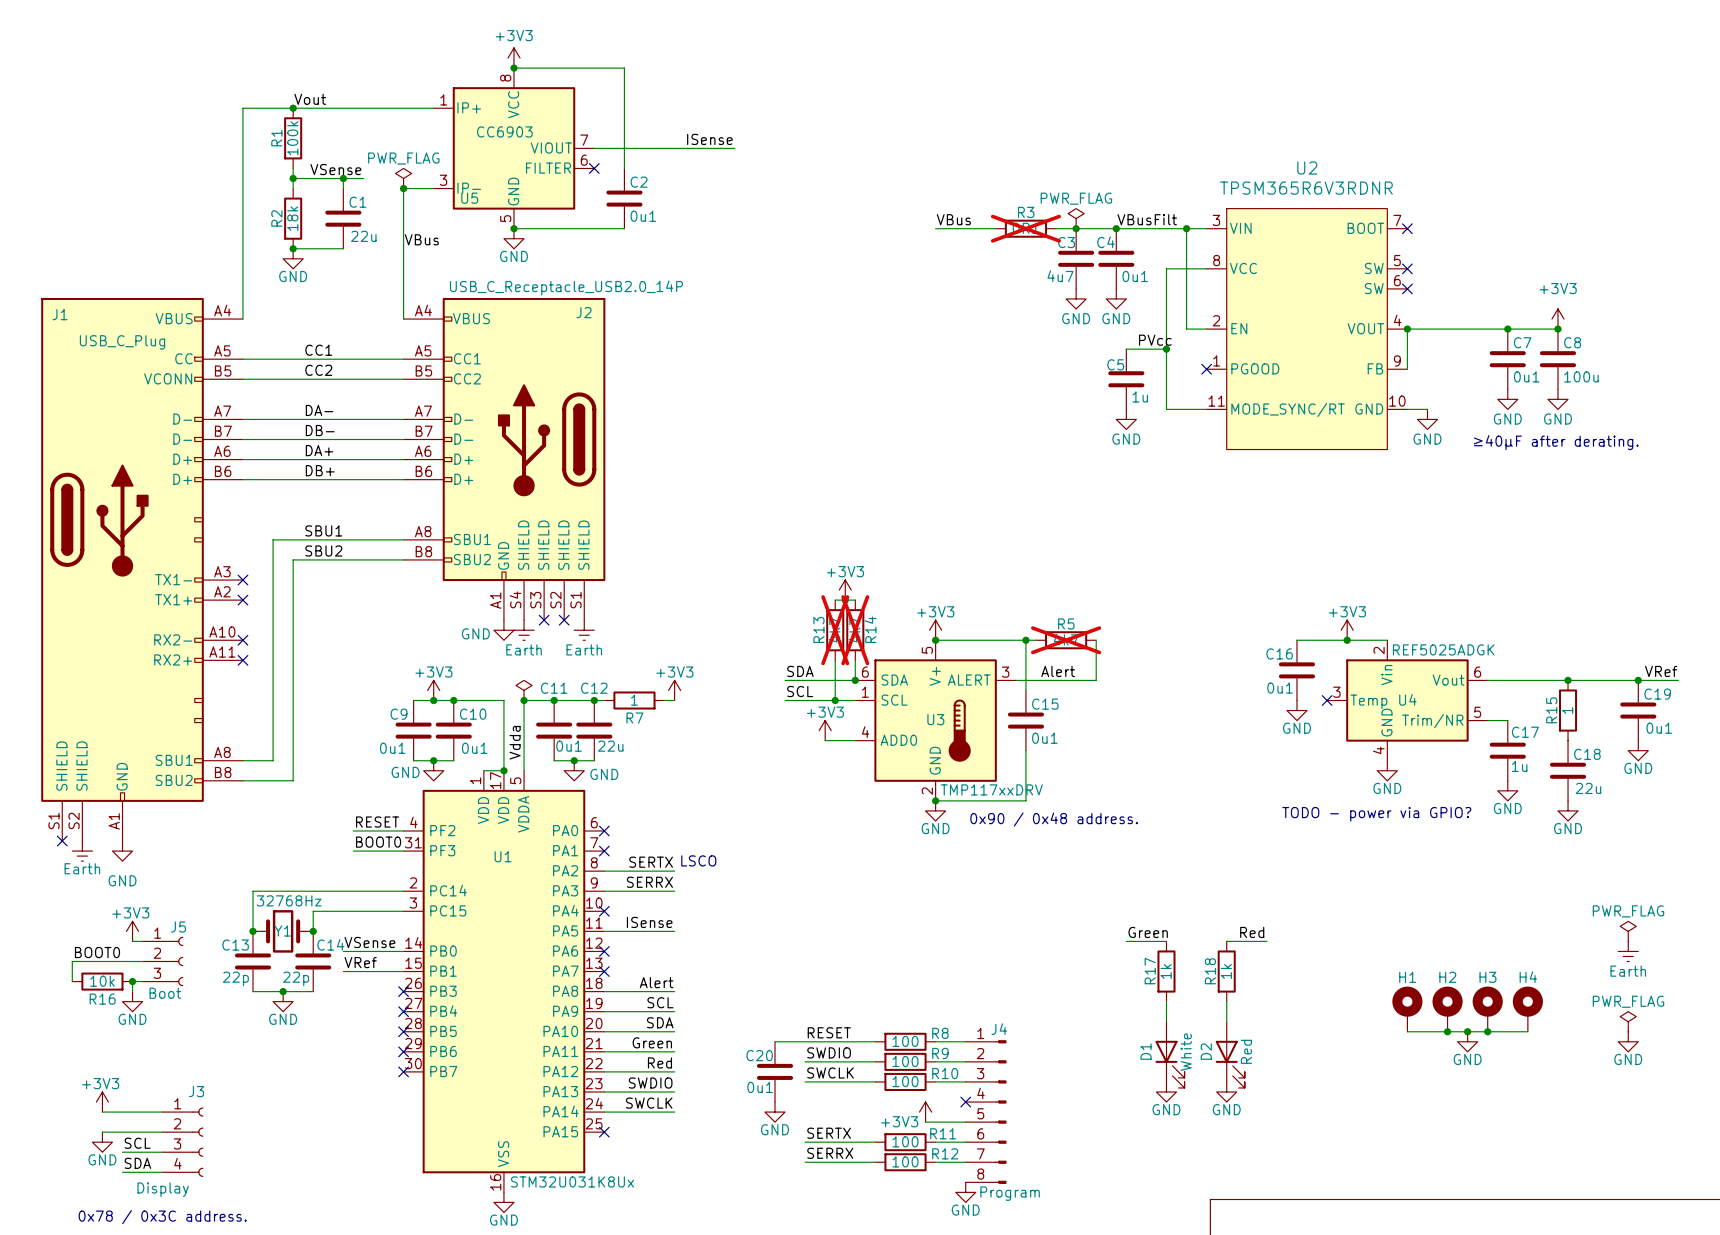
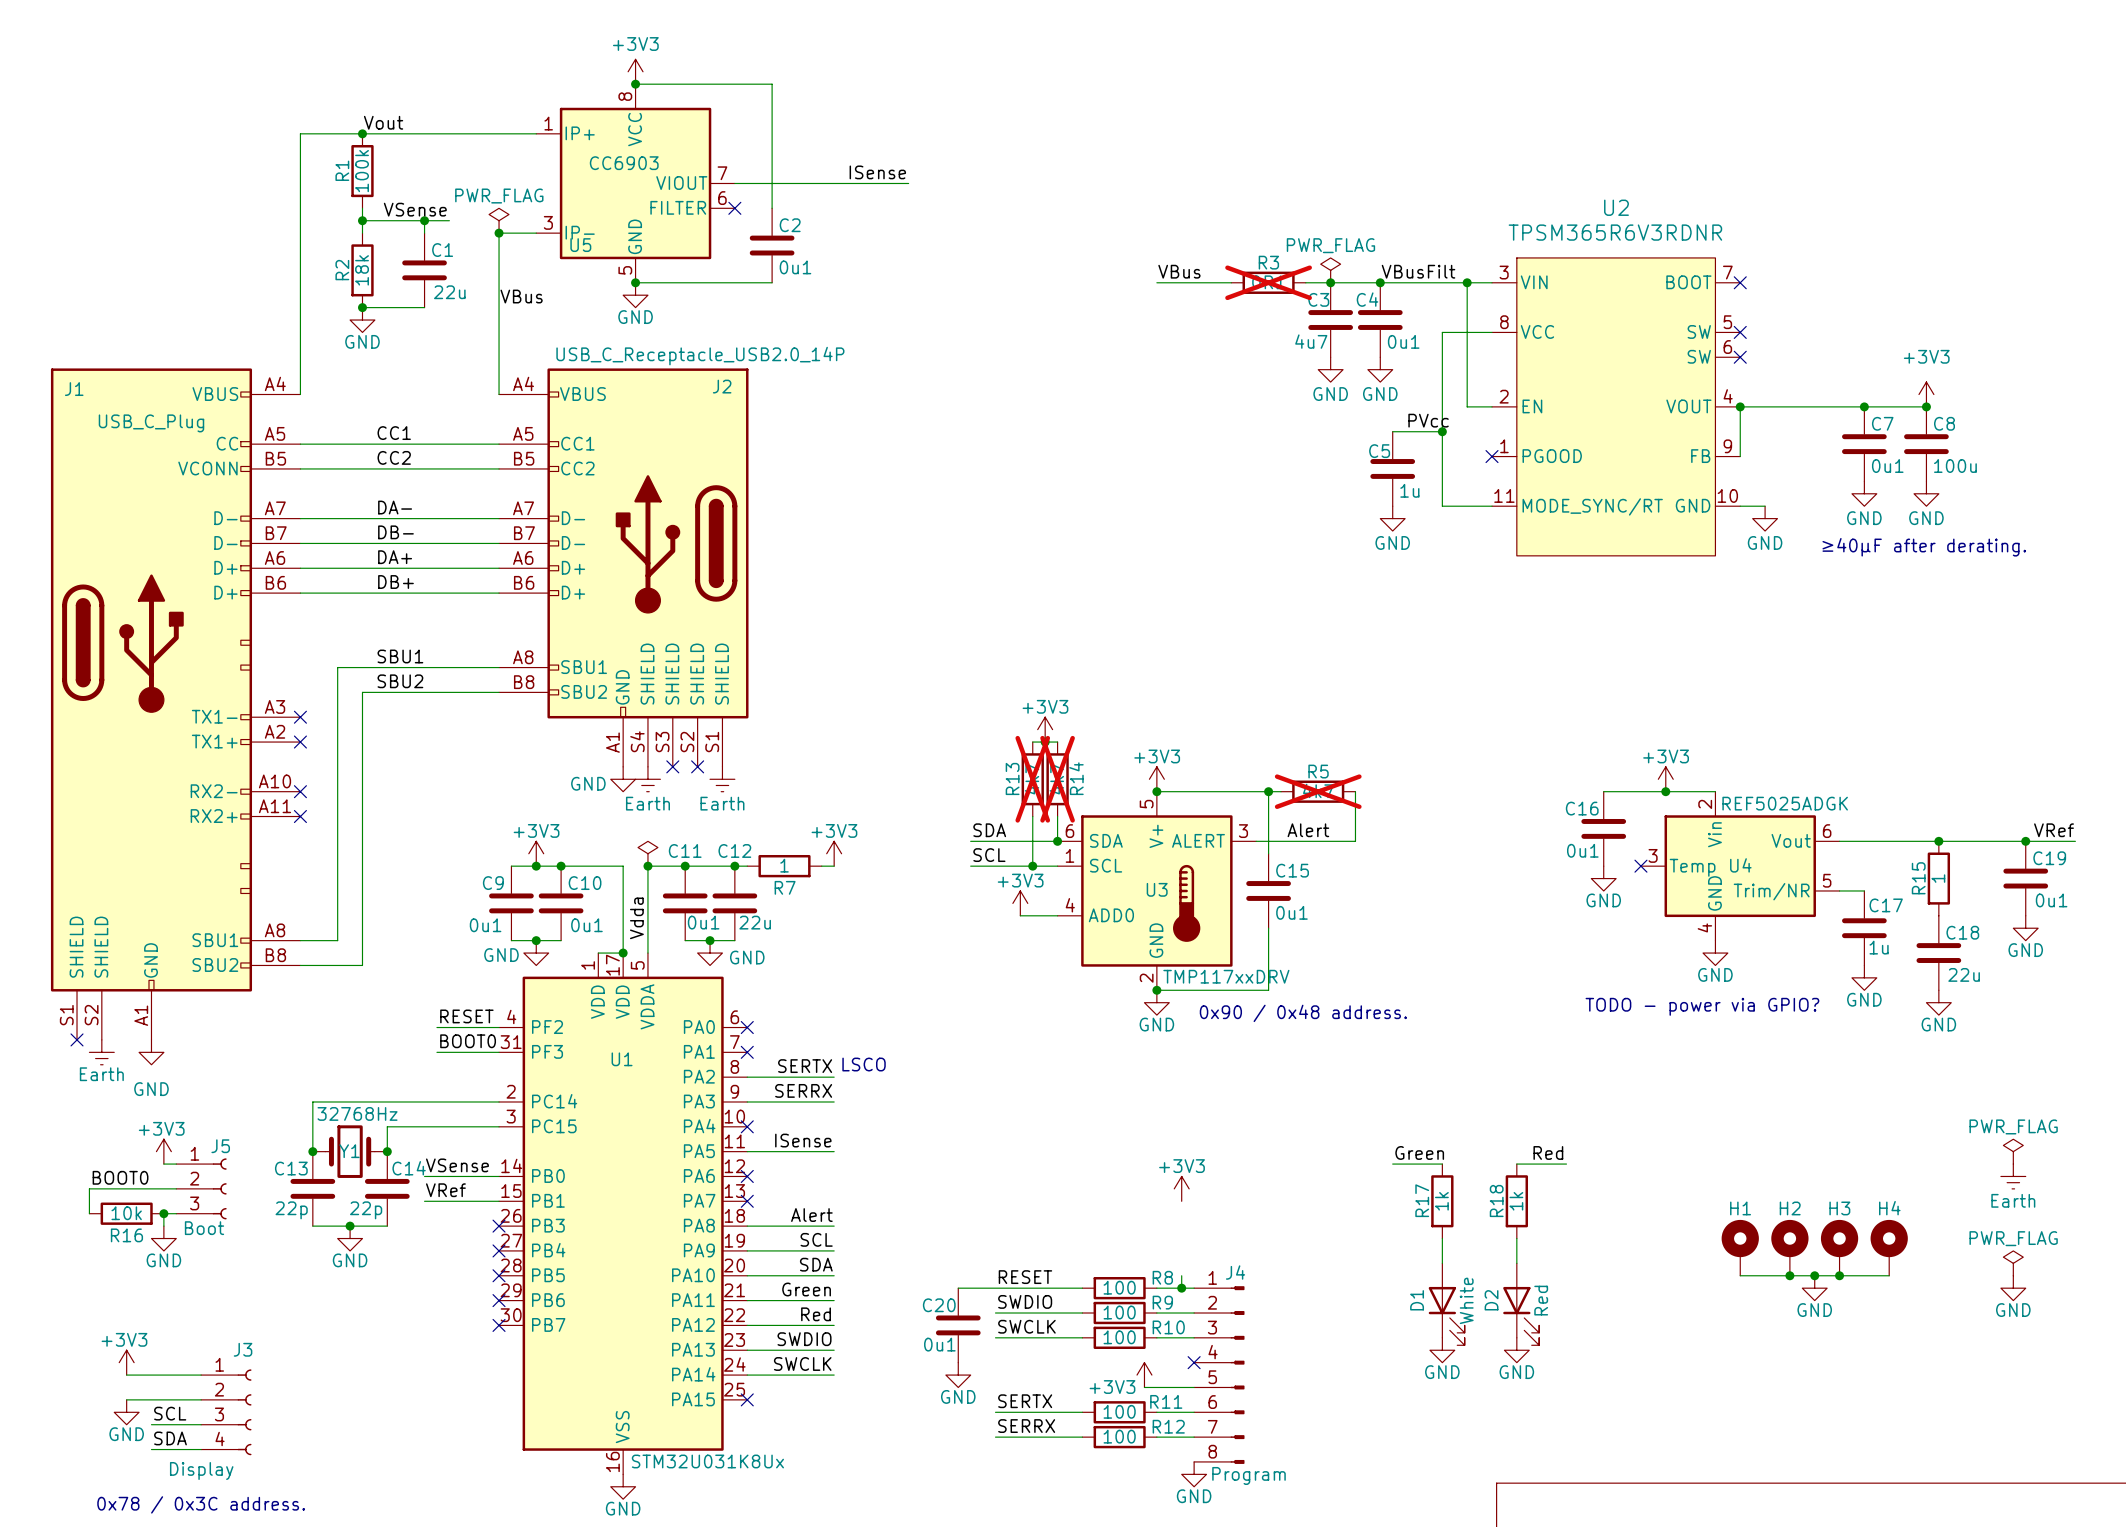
power symbol: none -> +3V3 (1181, 1188)
wire: none -> (1181, 1275) (1181, 1288)
junction: none -> (1181, 1288)

